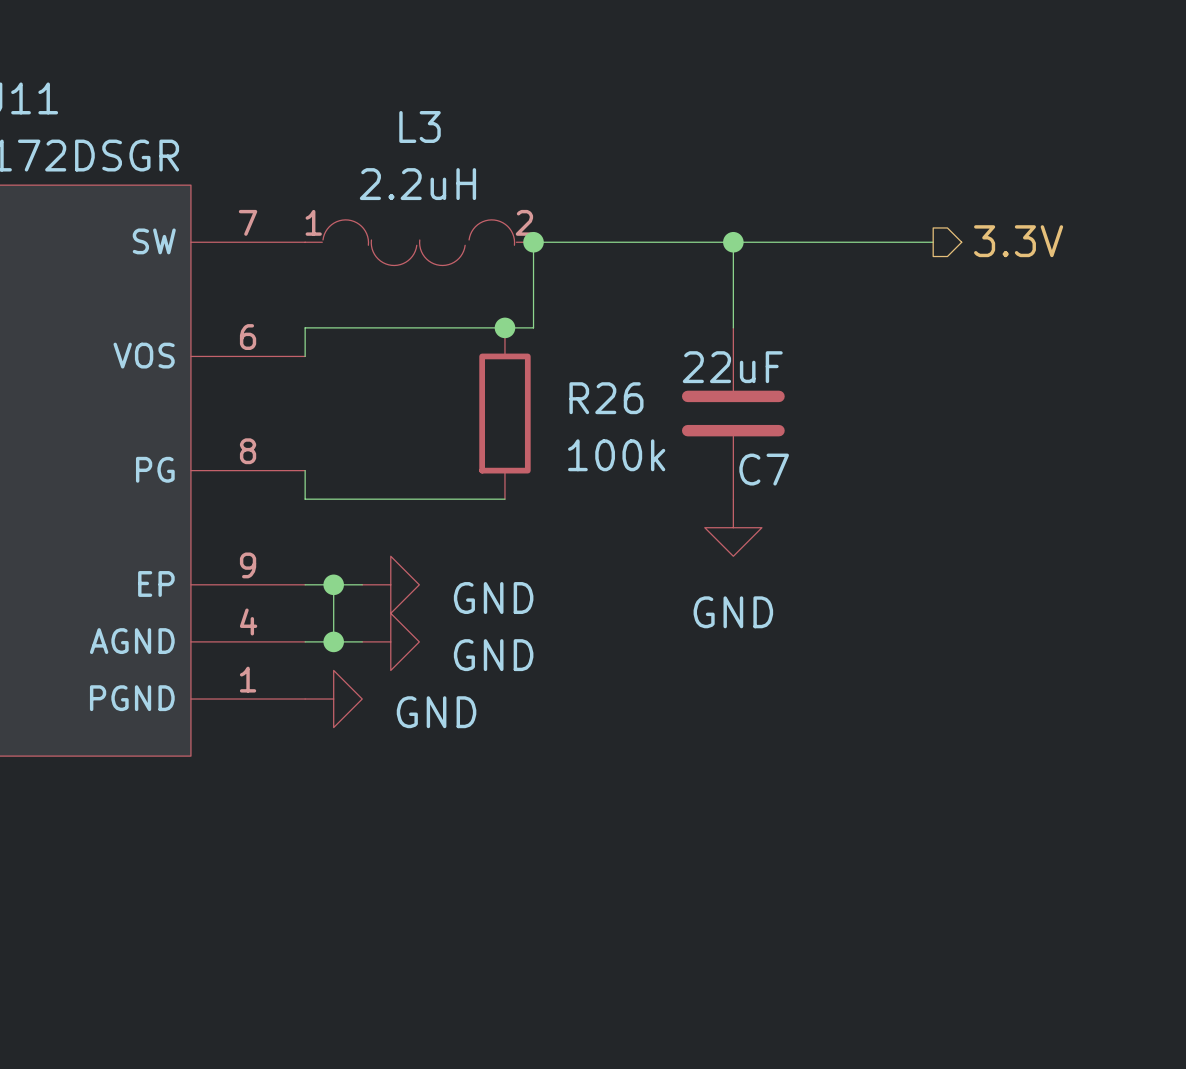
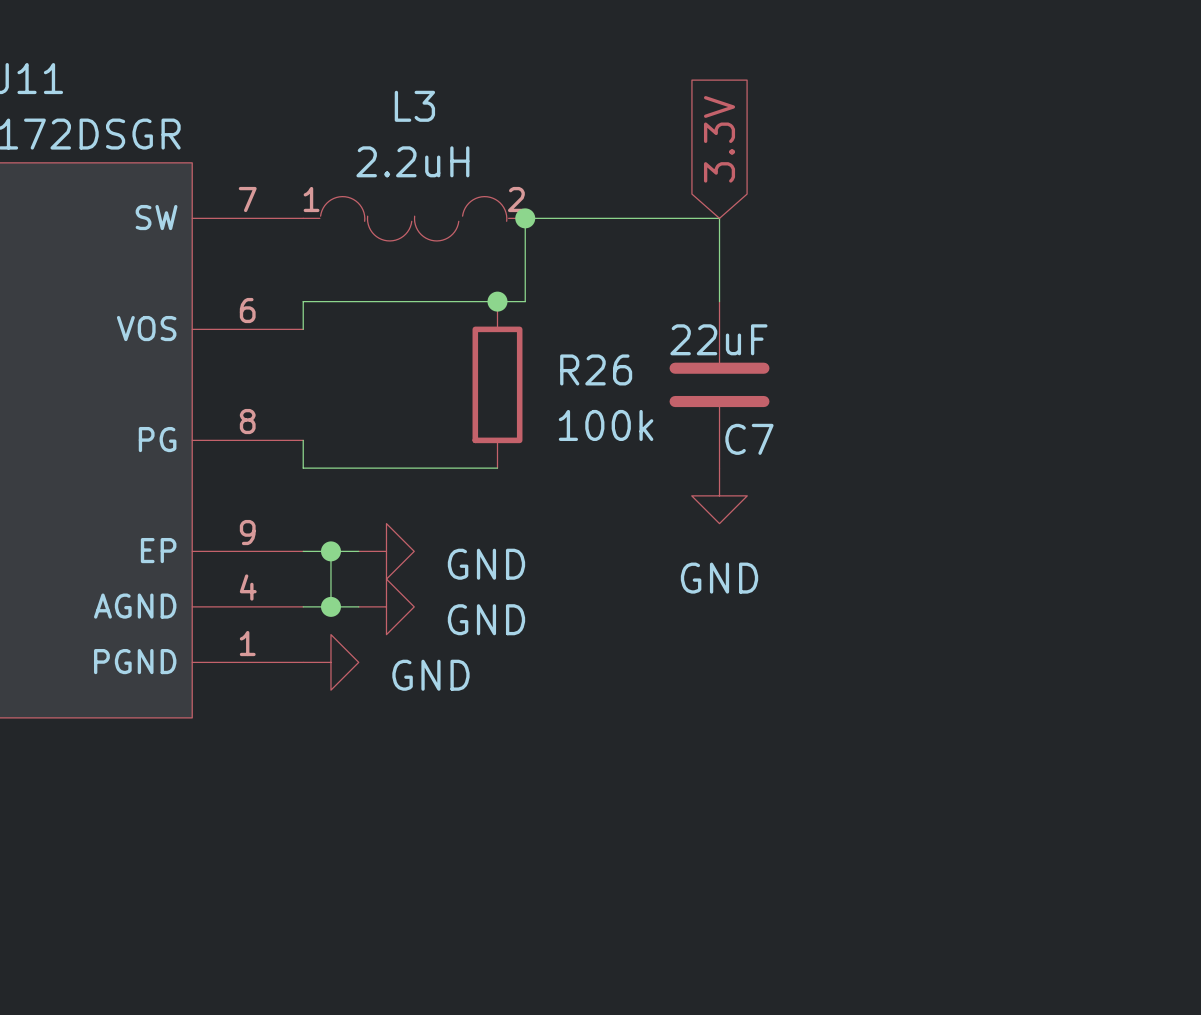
global label: none -> 3.3V (719, 139)
hierarchical label: 3.3V (1018, 241) -> none
wire: (733, 242) (933, 242) -> none
junction: (733, 242) -> none

